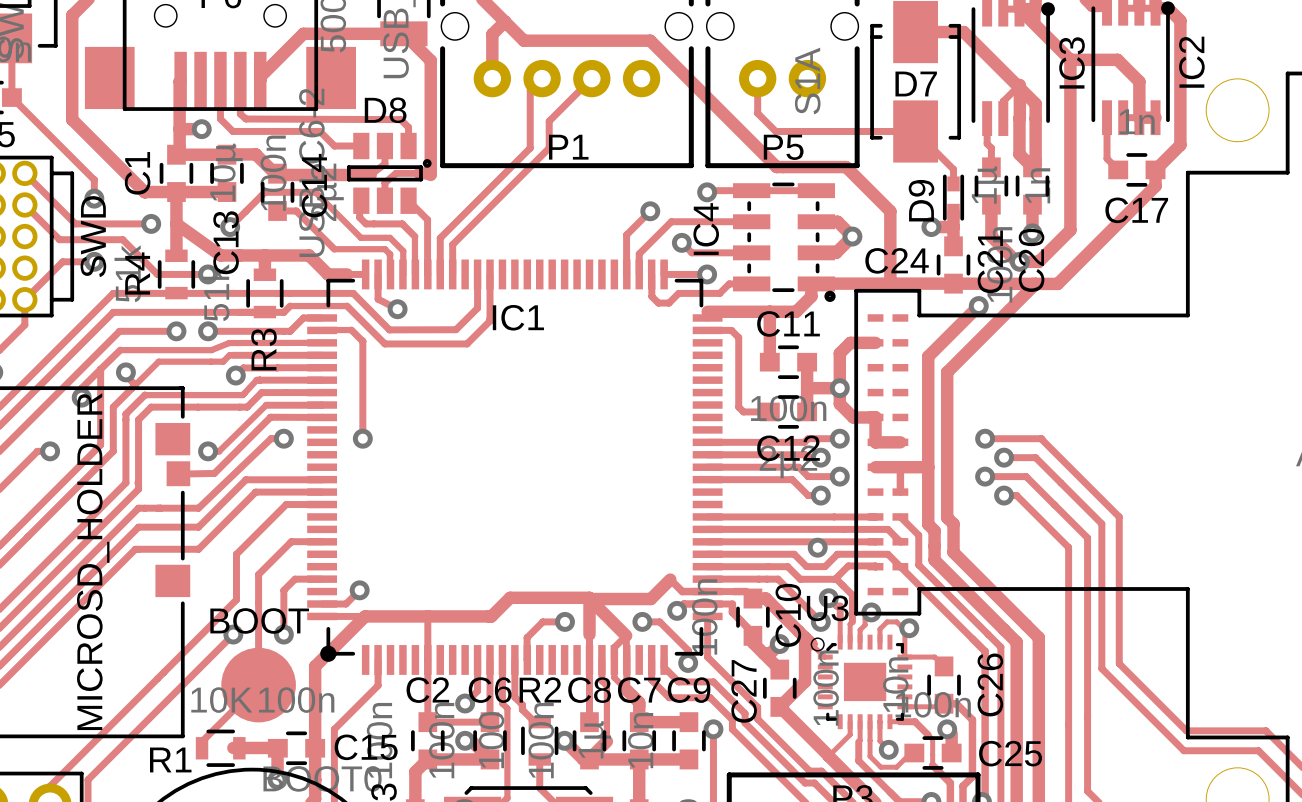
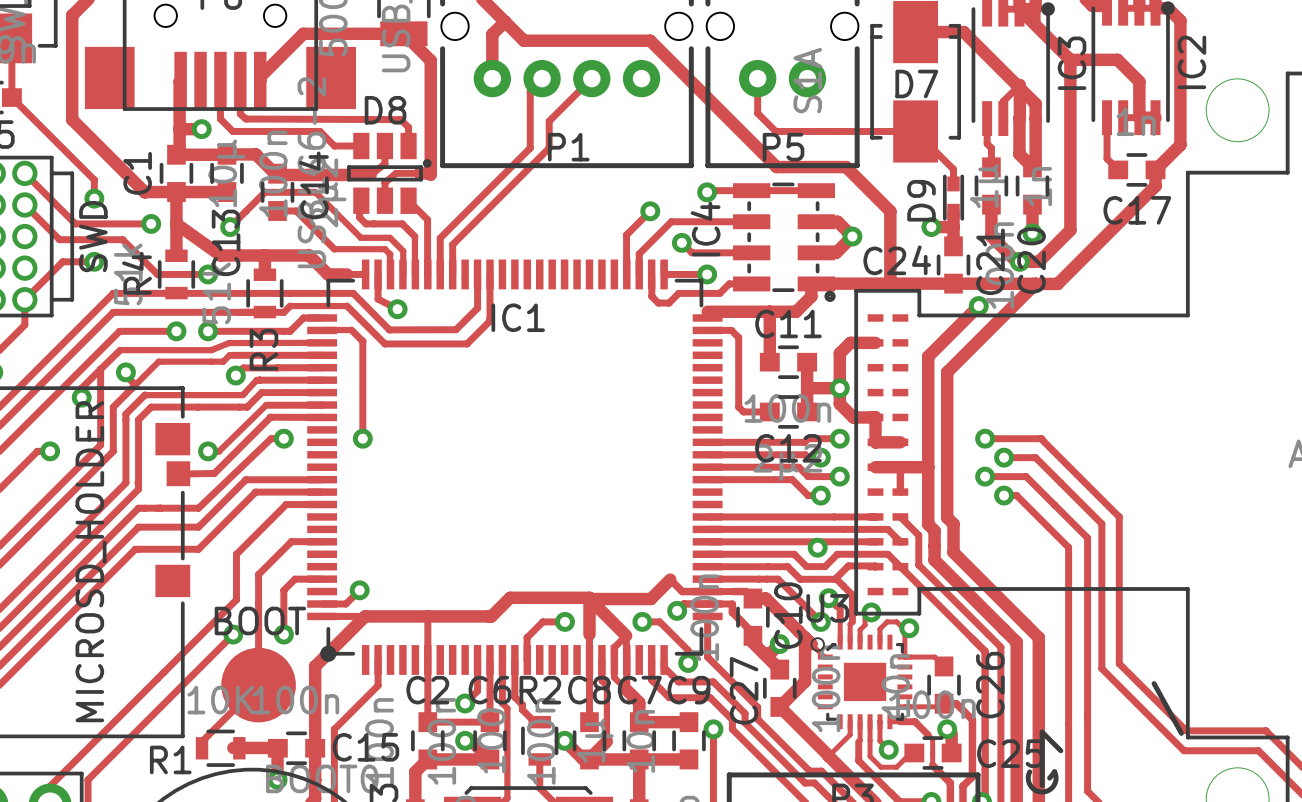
line: none -> (1154, 683) (1181, 733)
line: none -> (1060, 750) (1042, 732) (1042, 785)
line: none -> (1029, 771) (1029, 783) (1038, 791) (1045, 791) (1052, 786) (1056, 778) (1054, 771) (1049, 778)

